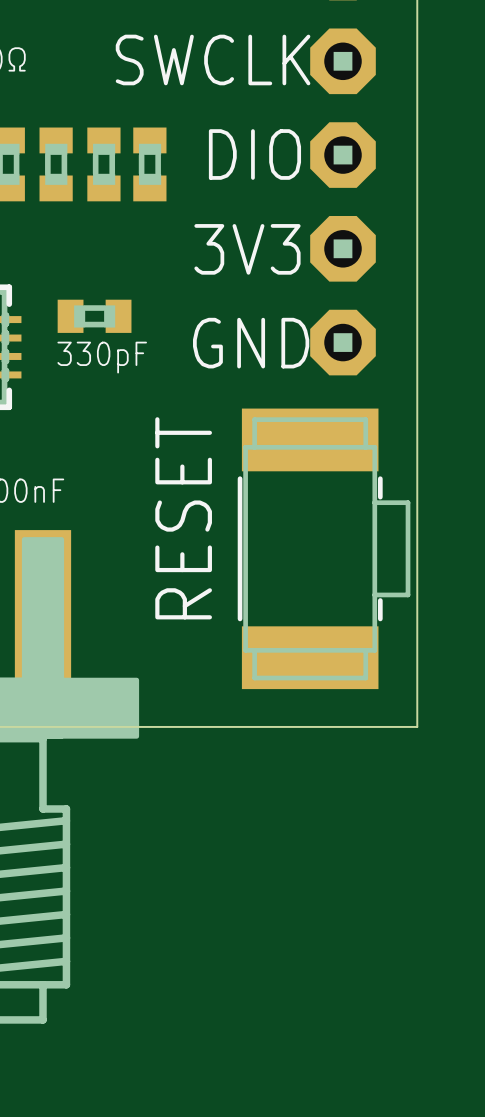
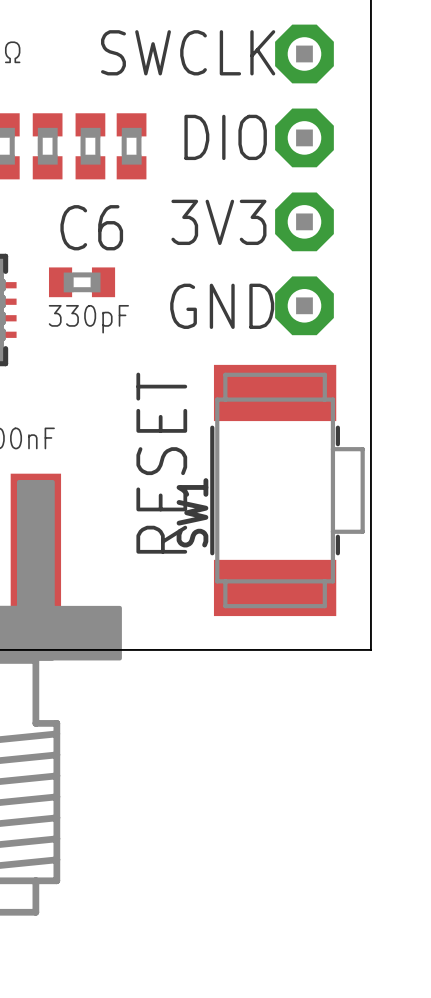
C6 name: none -> C6 (91, 227)
SW1 name: none -> SW1 (192, 512)

